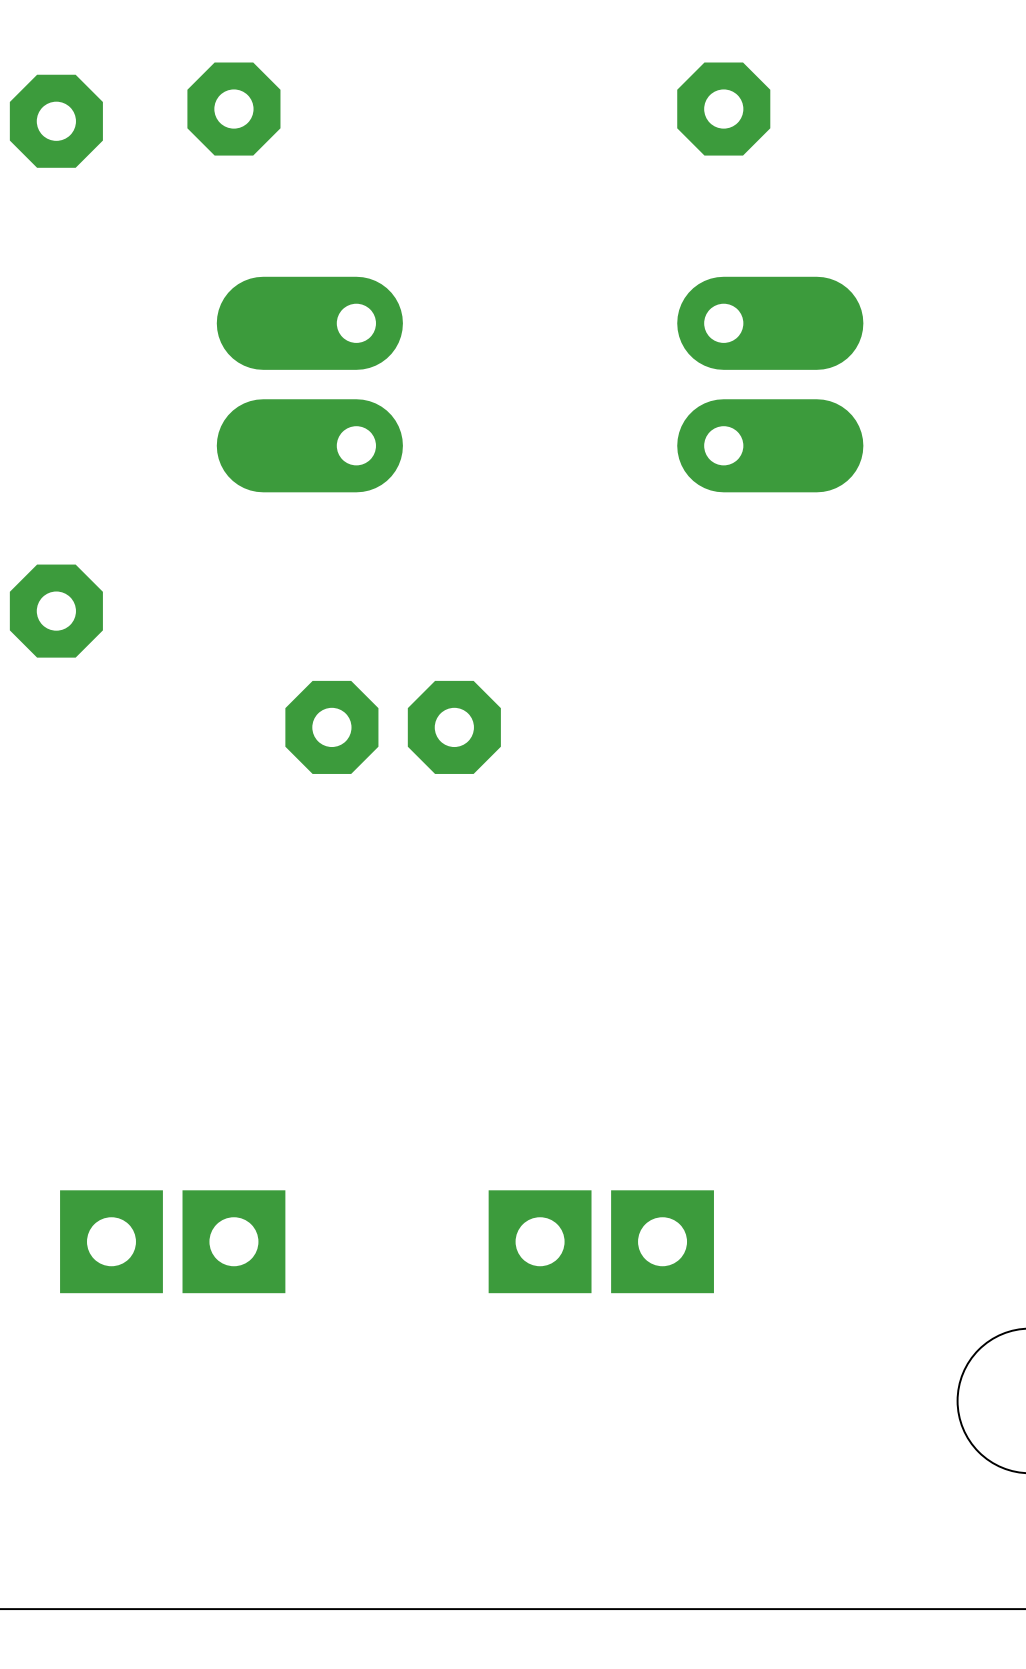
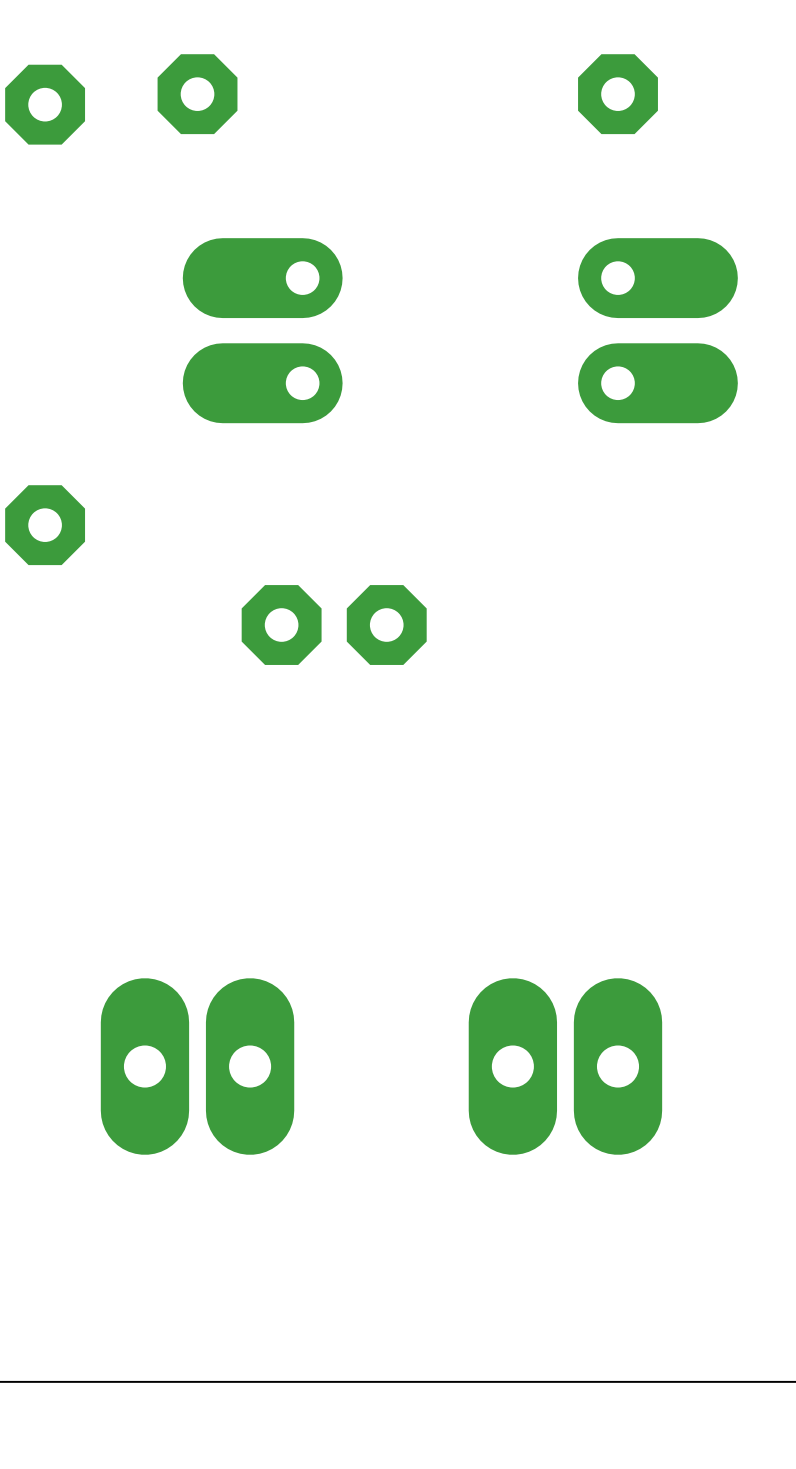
part: (172, 1241) -> none
part: none -> (197, 1066)
part: (601, 1241) -> none
part: none -> (565, 1066)

